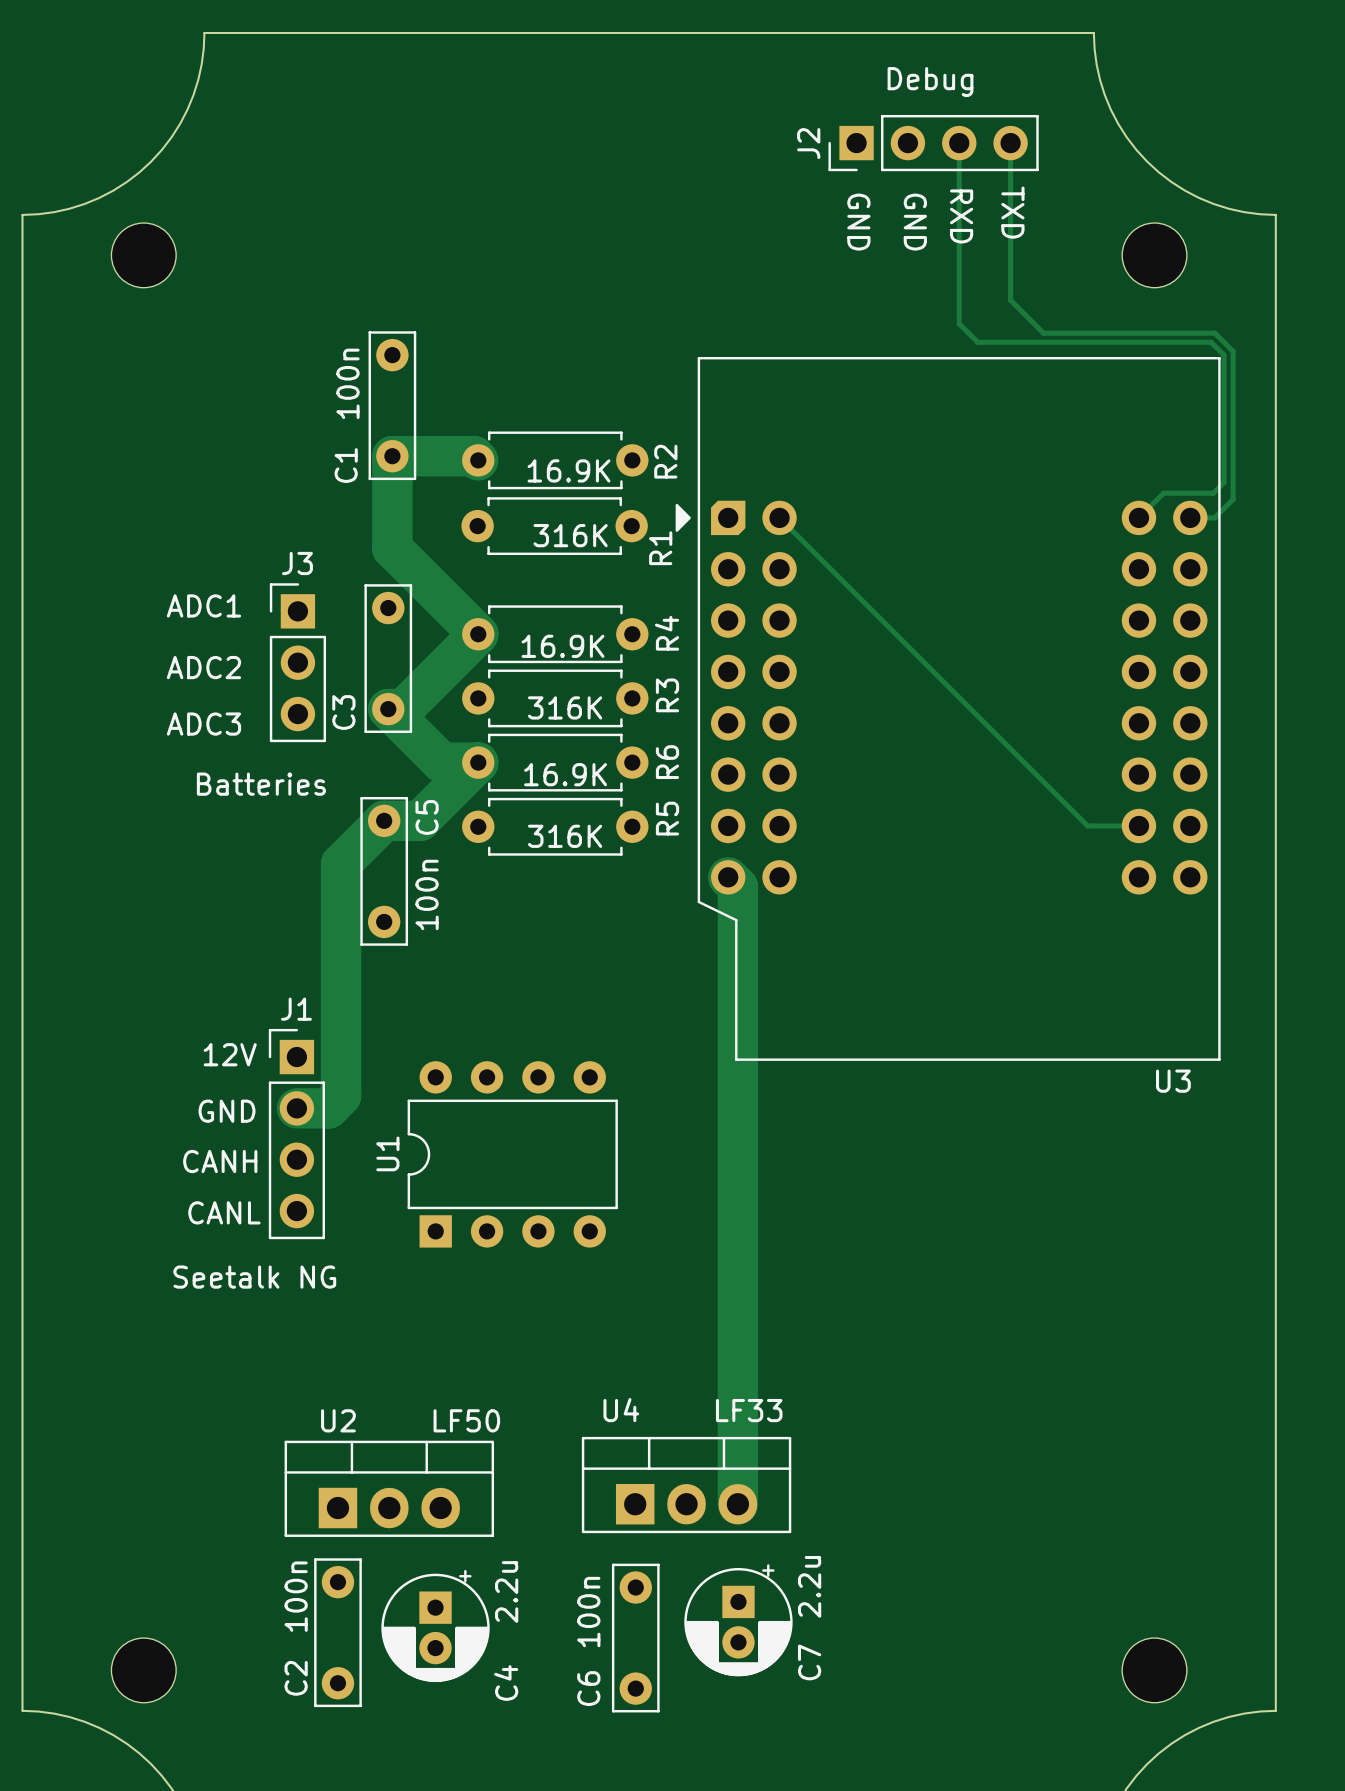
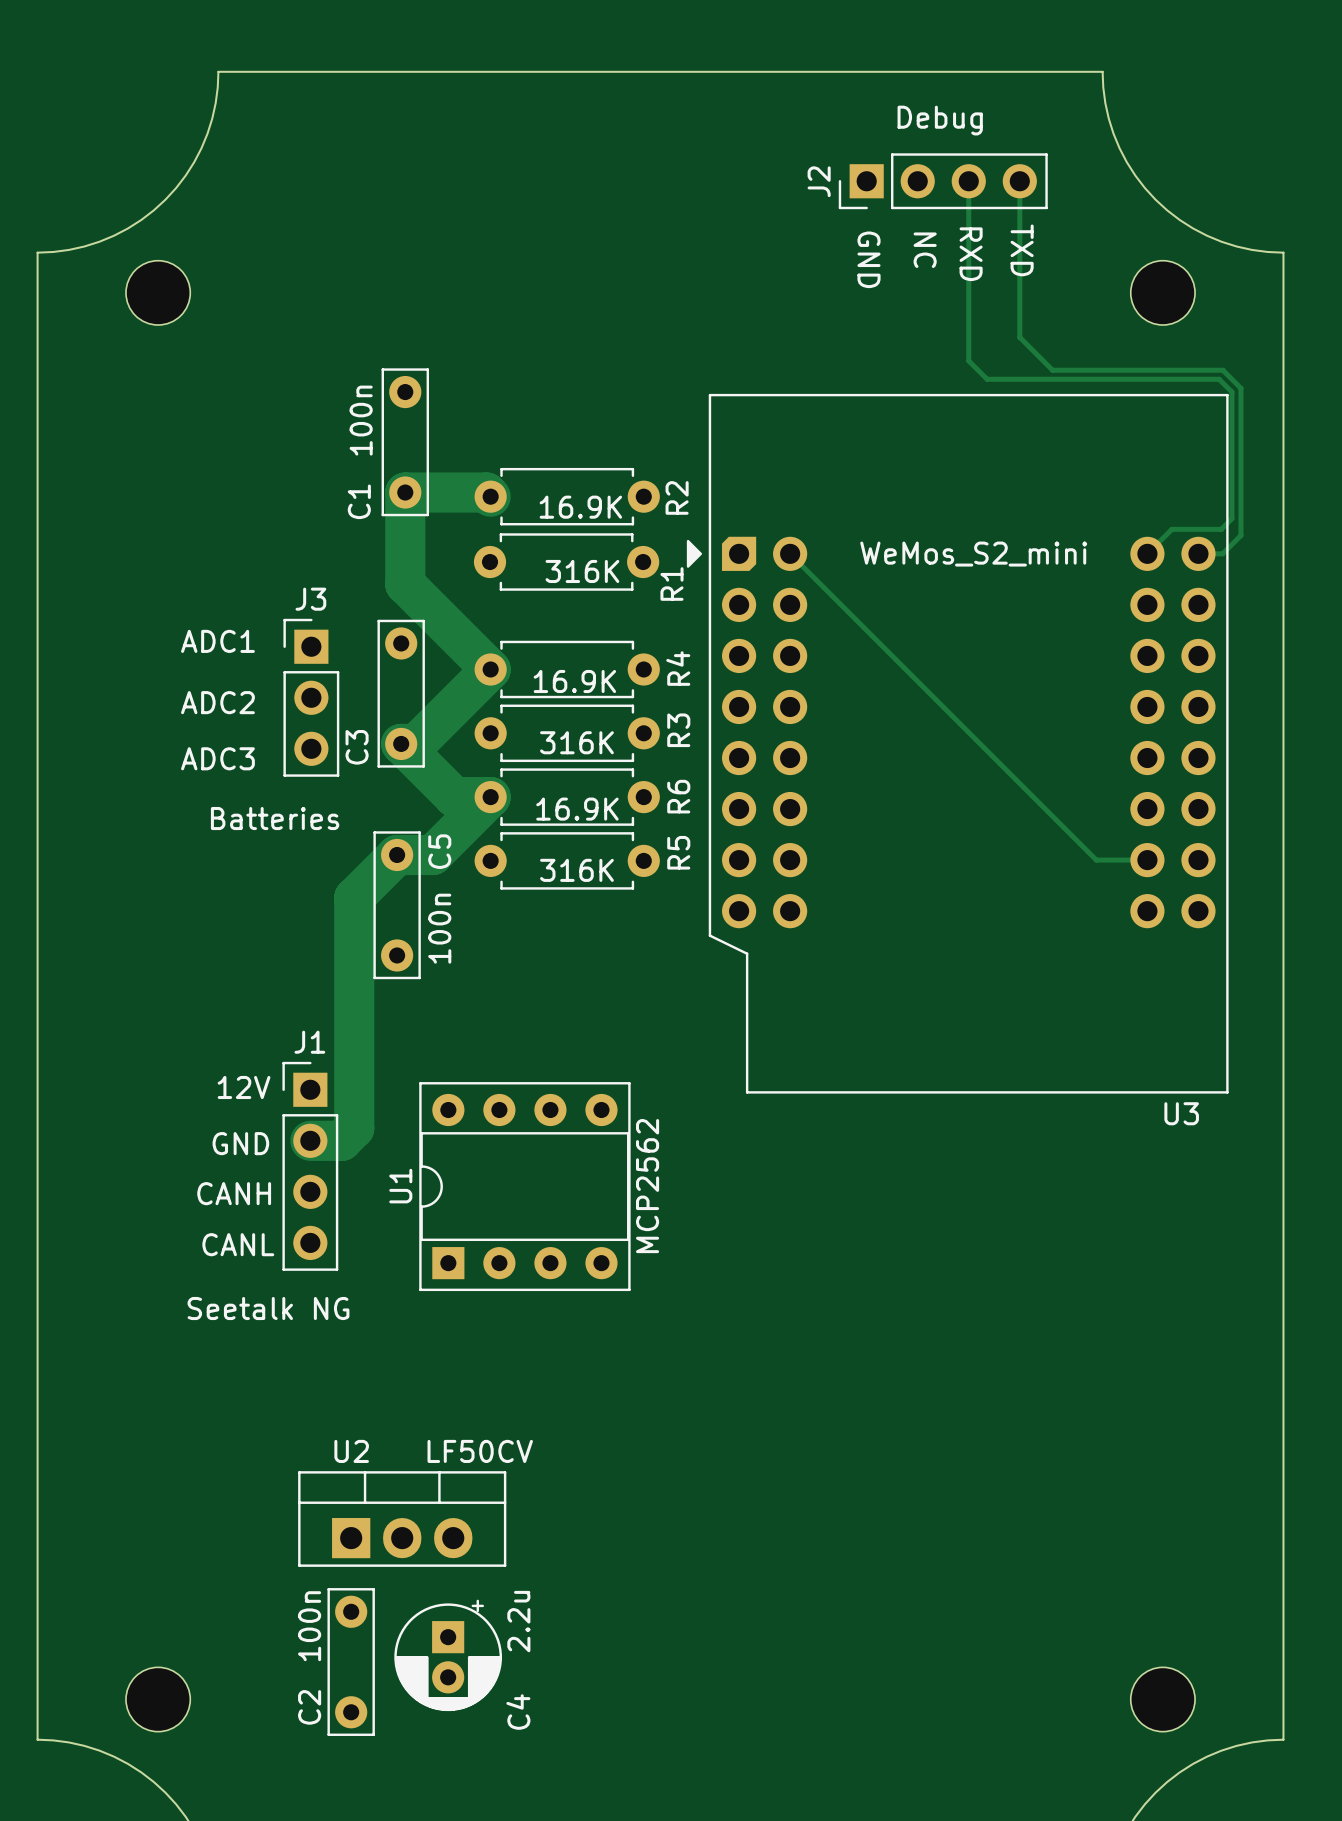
text: GND (915, 222) -> NC (925, 250)
U3 value: none -> WeMos_S2_mini (973, 554)
track: (728, 877) (737, 887) (737, 1504) -> none
U1 footprint: [407, 1061, 618, 1248] -> [419, 1082, 631, 1292]
U1 value: none -> MCP2562 (647, 1186)
U2 value: LF50 (466, 1420) -> LF50CV (480, 1451)
U4: LF33 (686, 1485) -> none
C7: 2.2u (738, 1620) -> none
C6: 100n (635, 1638) -> none

